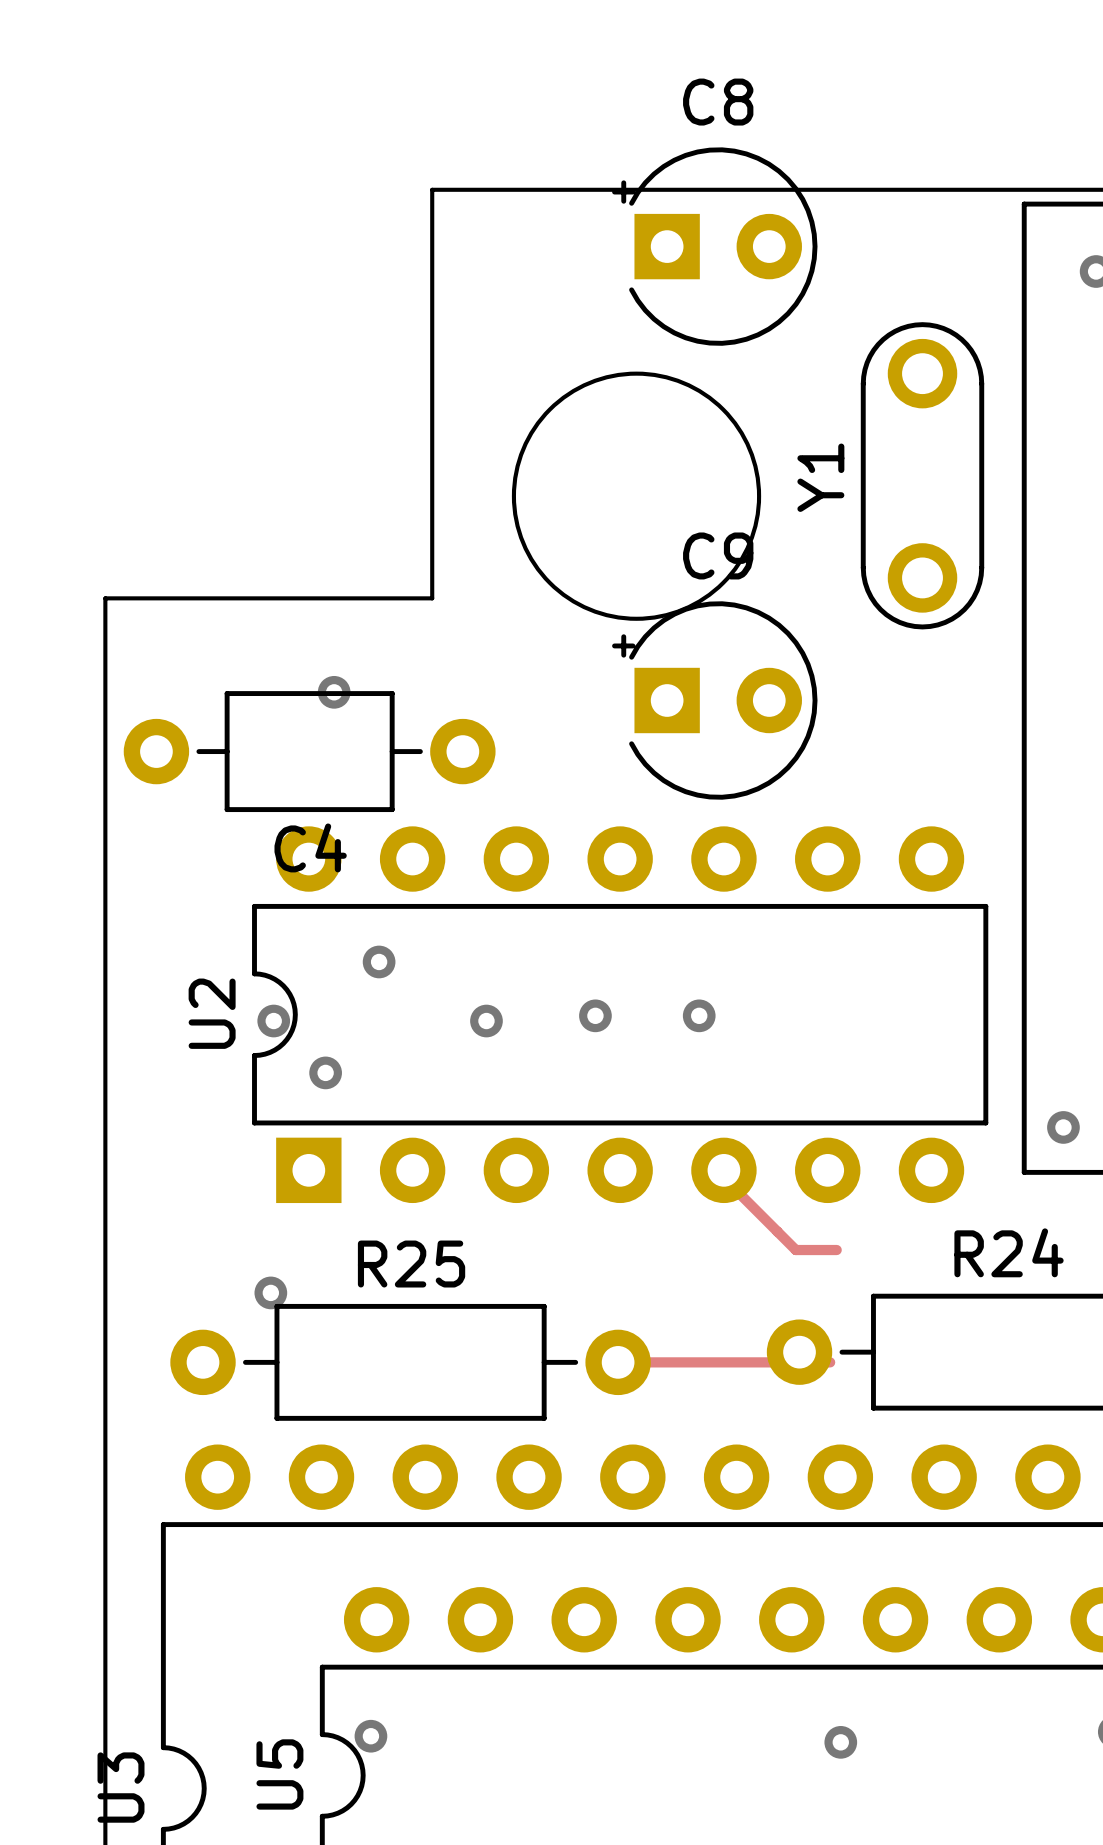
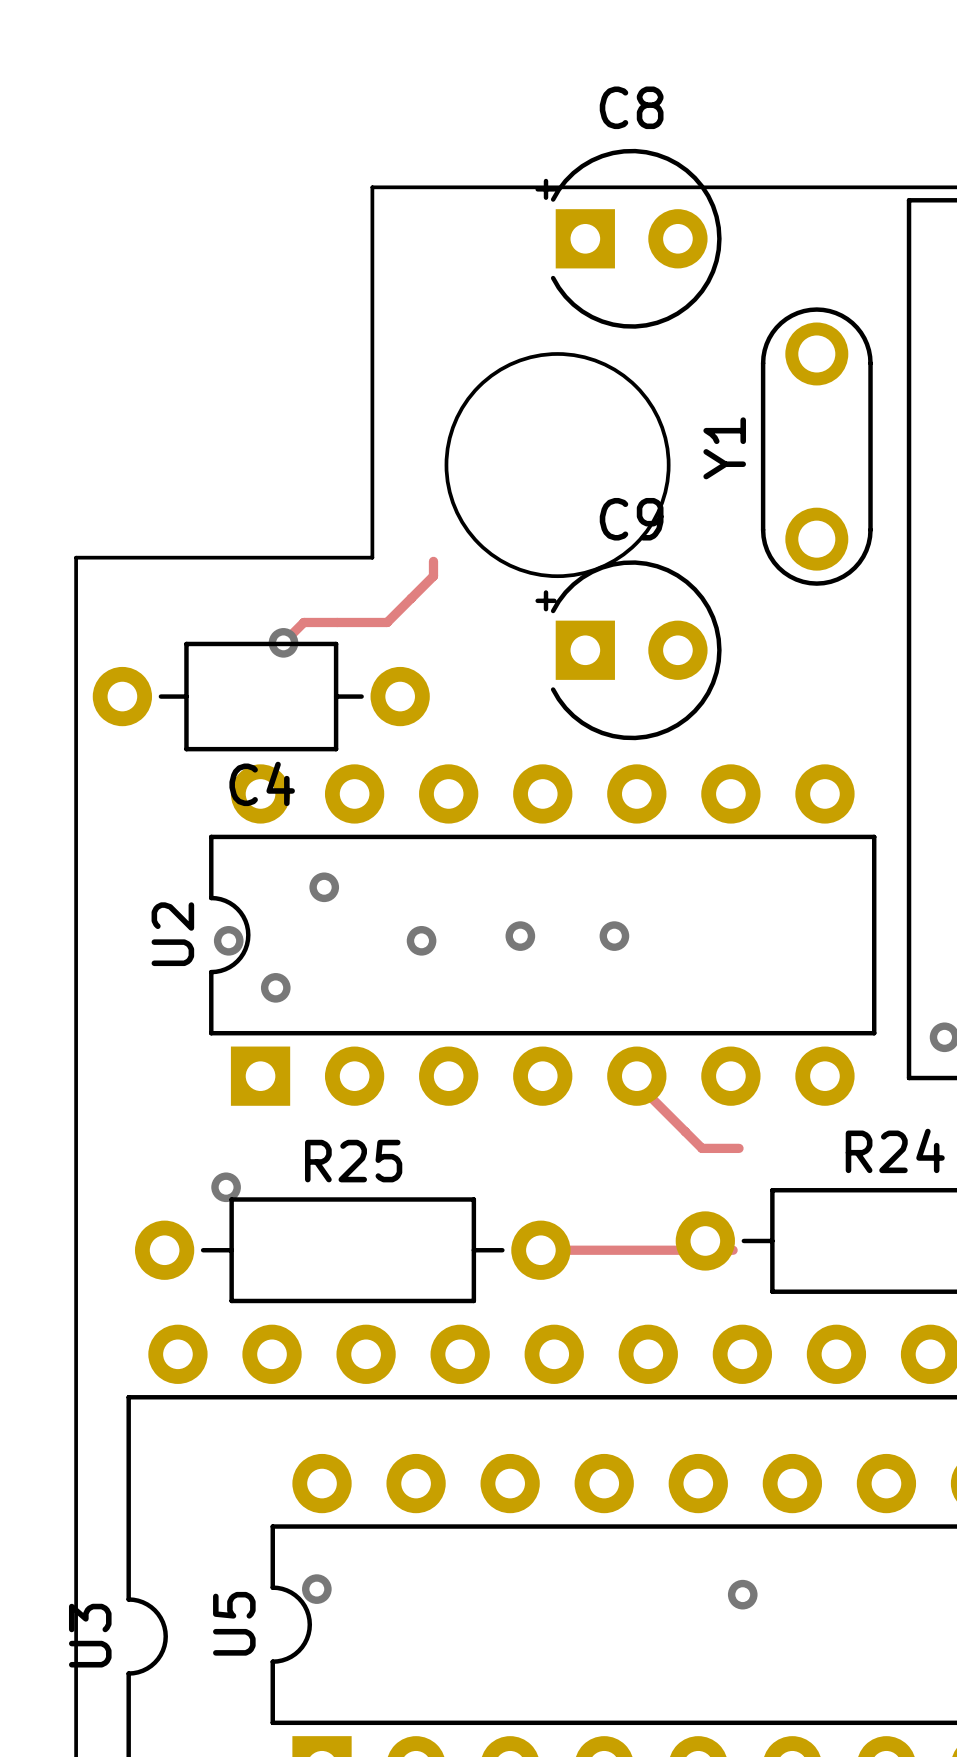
track: none -> (433, 561) (433, 576) (387, 622) (303, 622) (283, 642)

